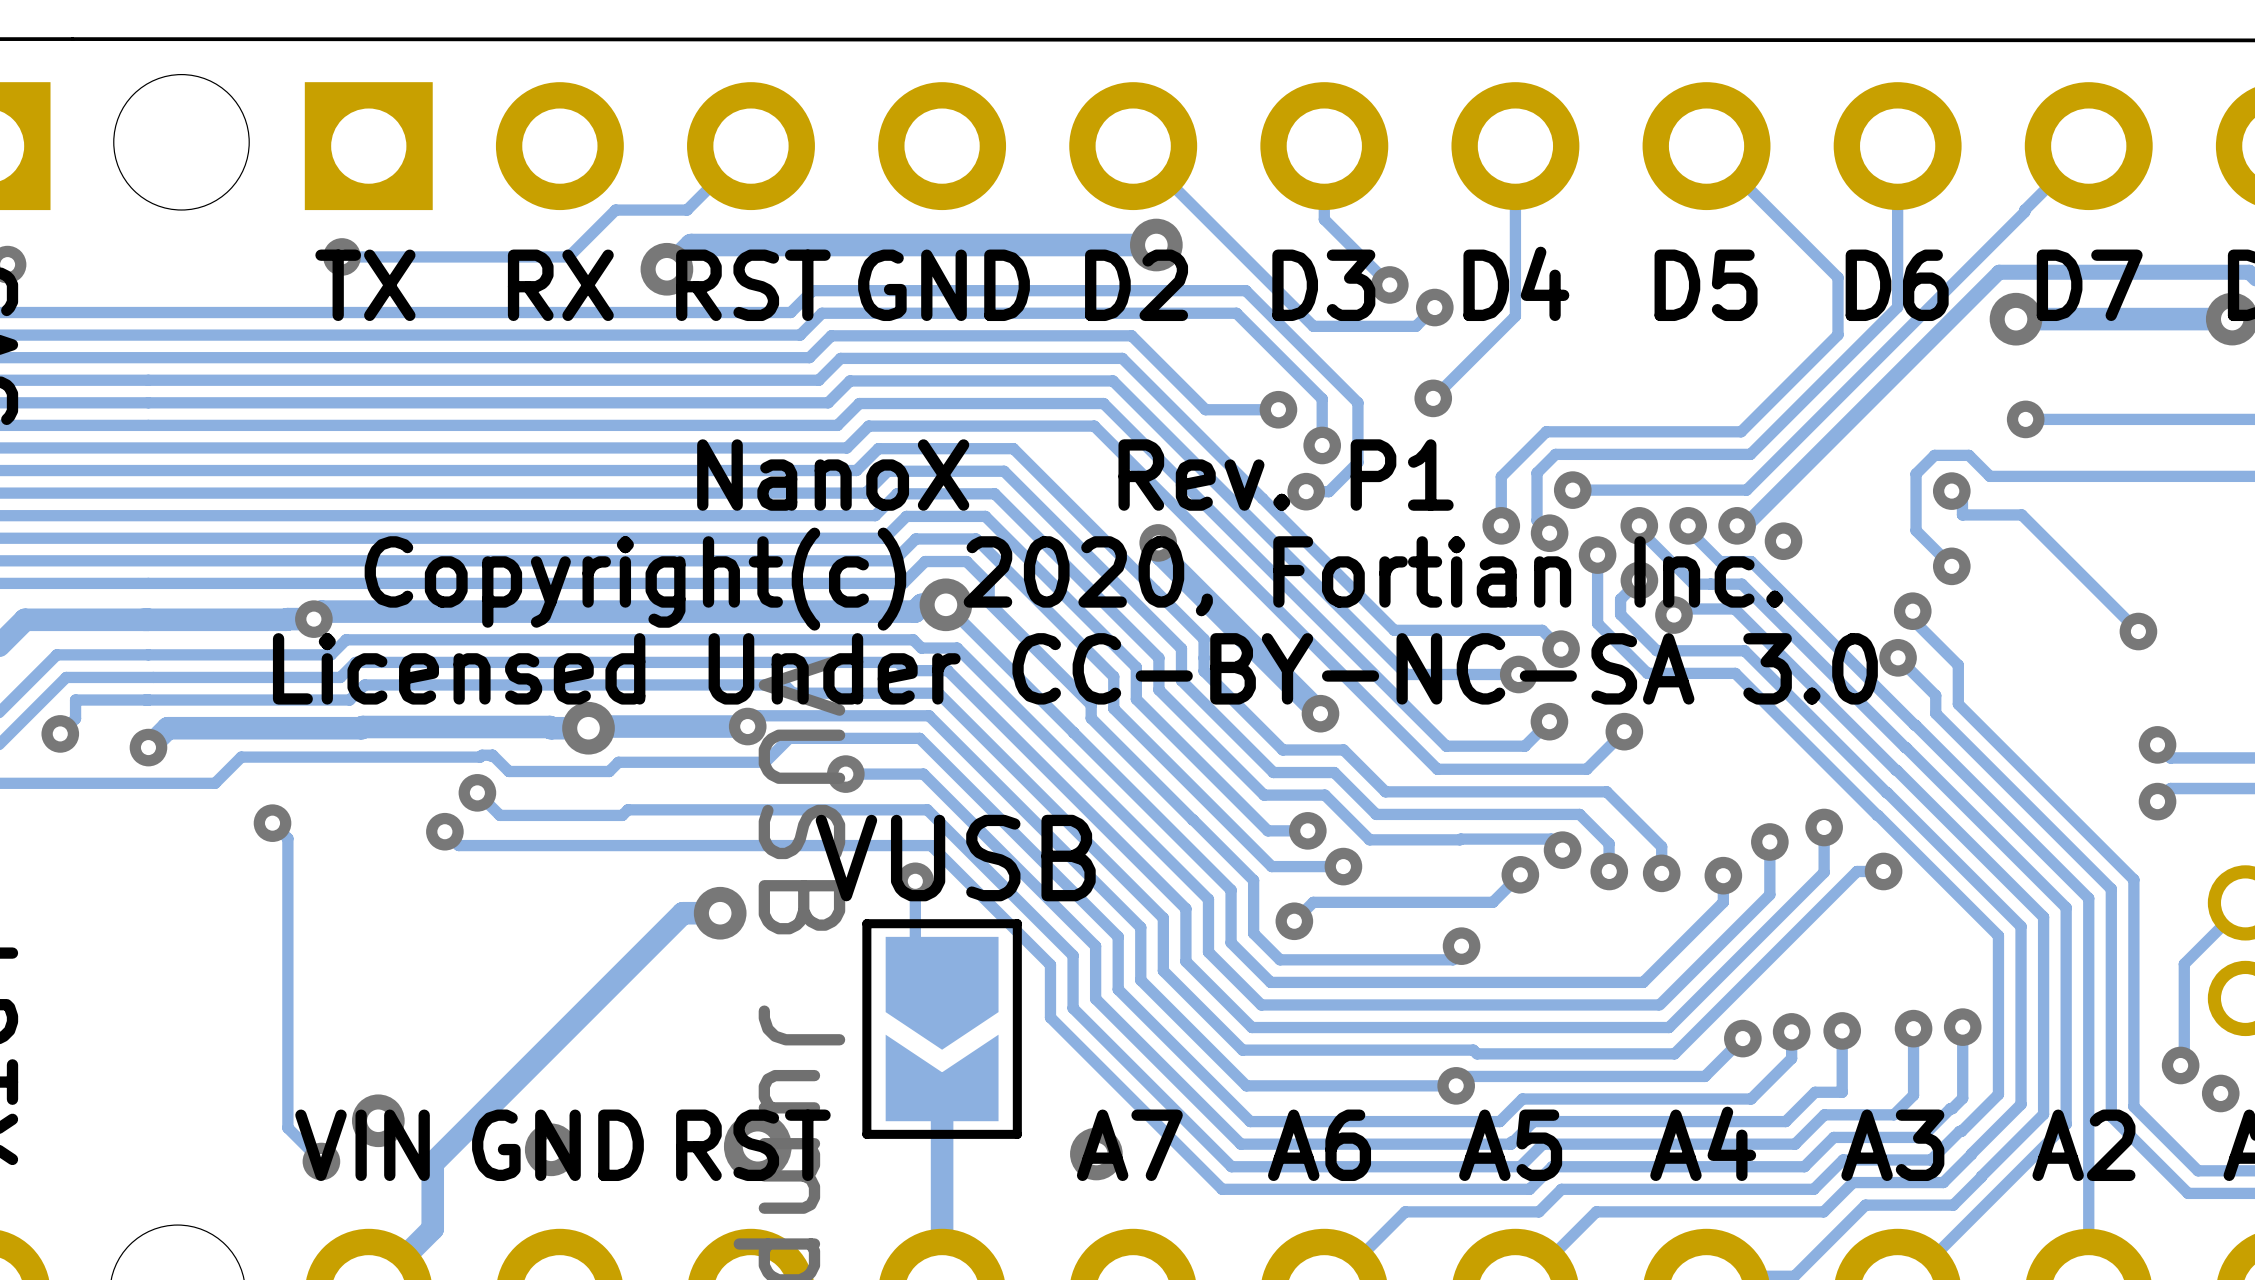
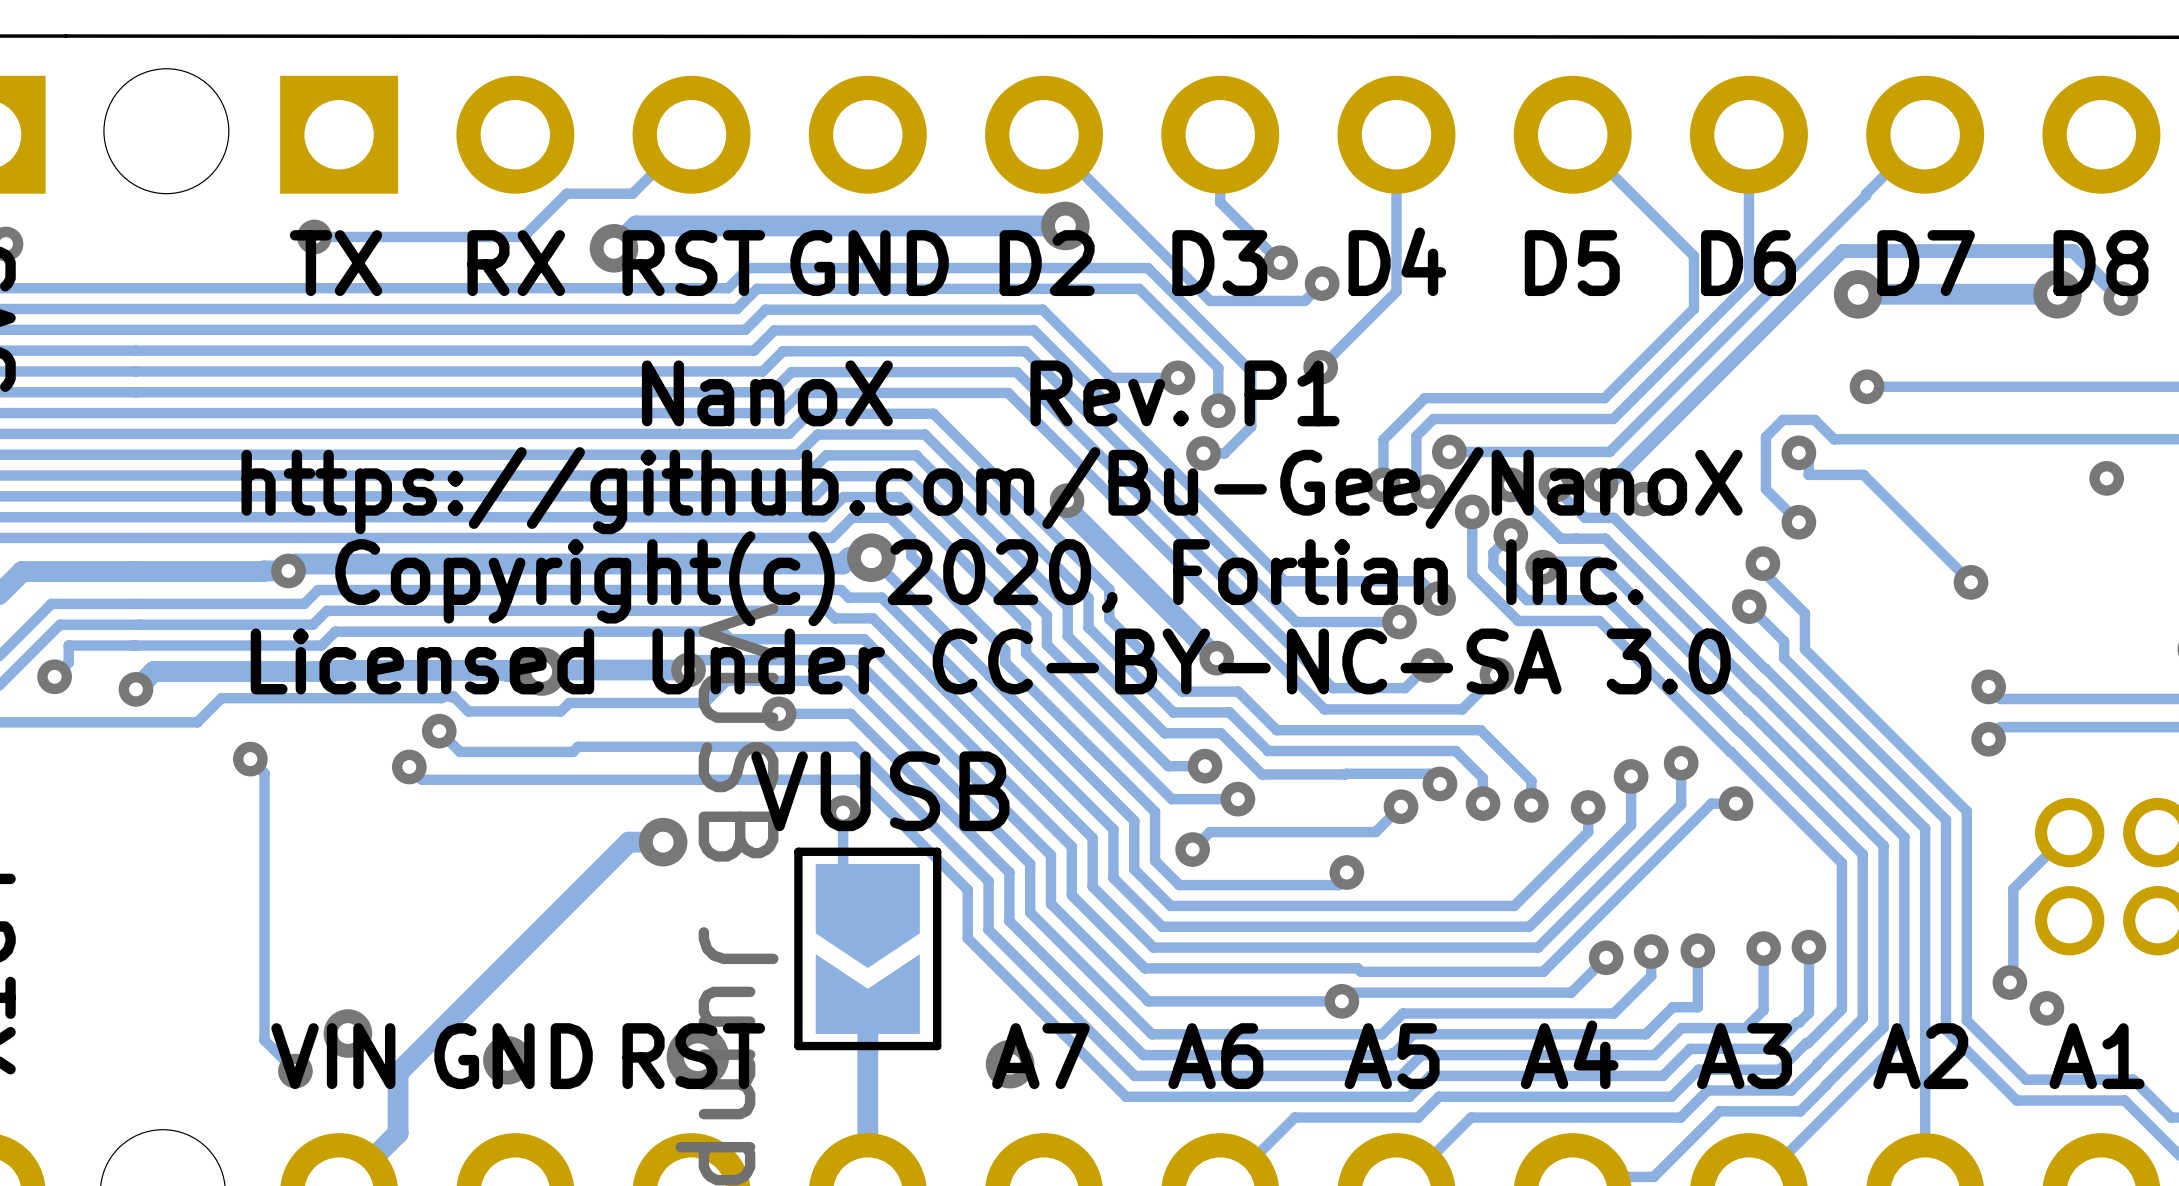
text position: NanoX Rev. P1 (1075, 475) -> NanoX Rev. P1 (990, 393)
text: none -> https://github.com/Bu-Gee/NanoX (992, 490)
text position: Copyright(c) 2020, Fortian Inc. (1073, 579) -> Copyright(c) 2020, Fortian Inc. (989, 578)
text position: Licensed Under CC-BY-NC-SA 3.0 (1075, 668) -> Licensed Under CC-BY-NC-SA 3.0 (990, 661)

